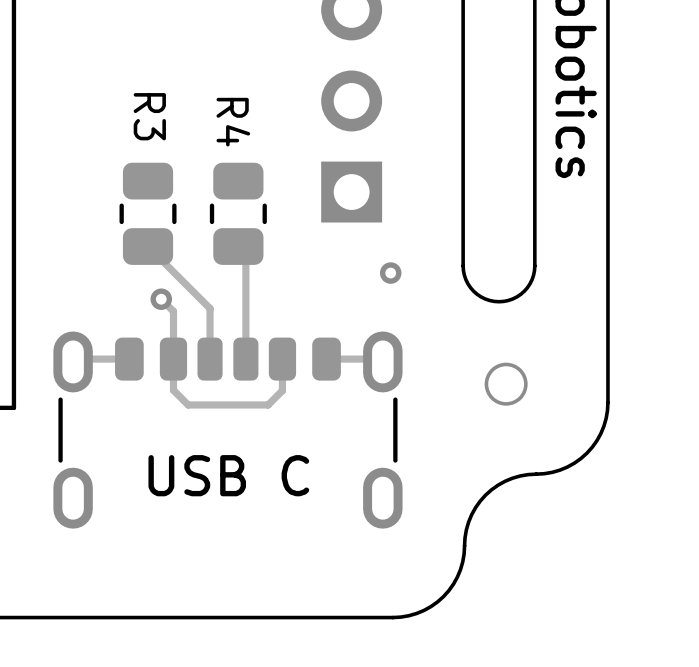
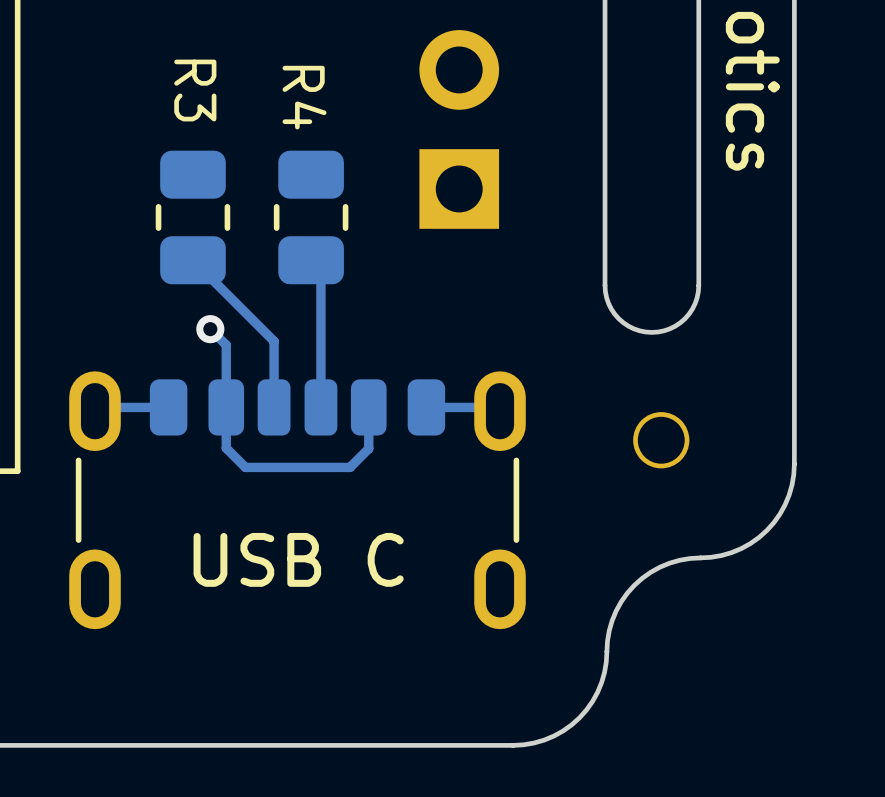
via: (390, 273) -> none

